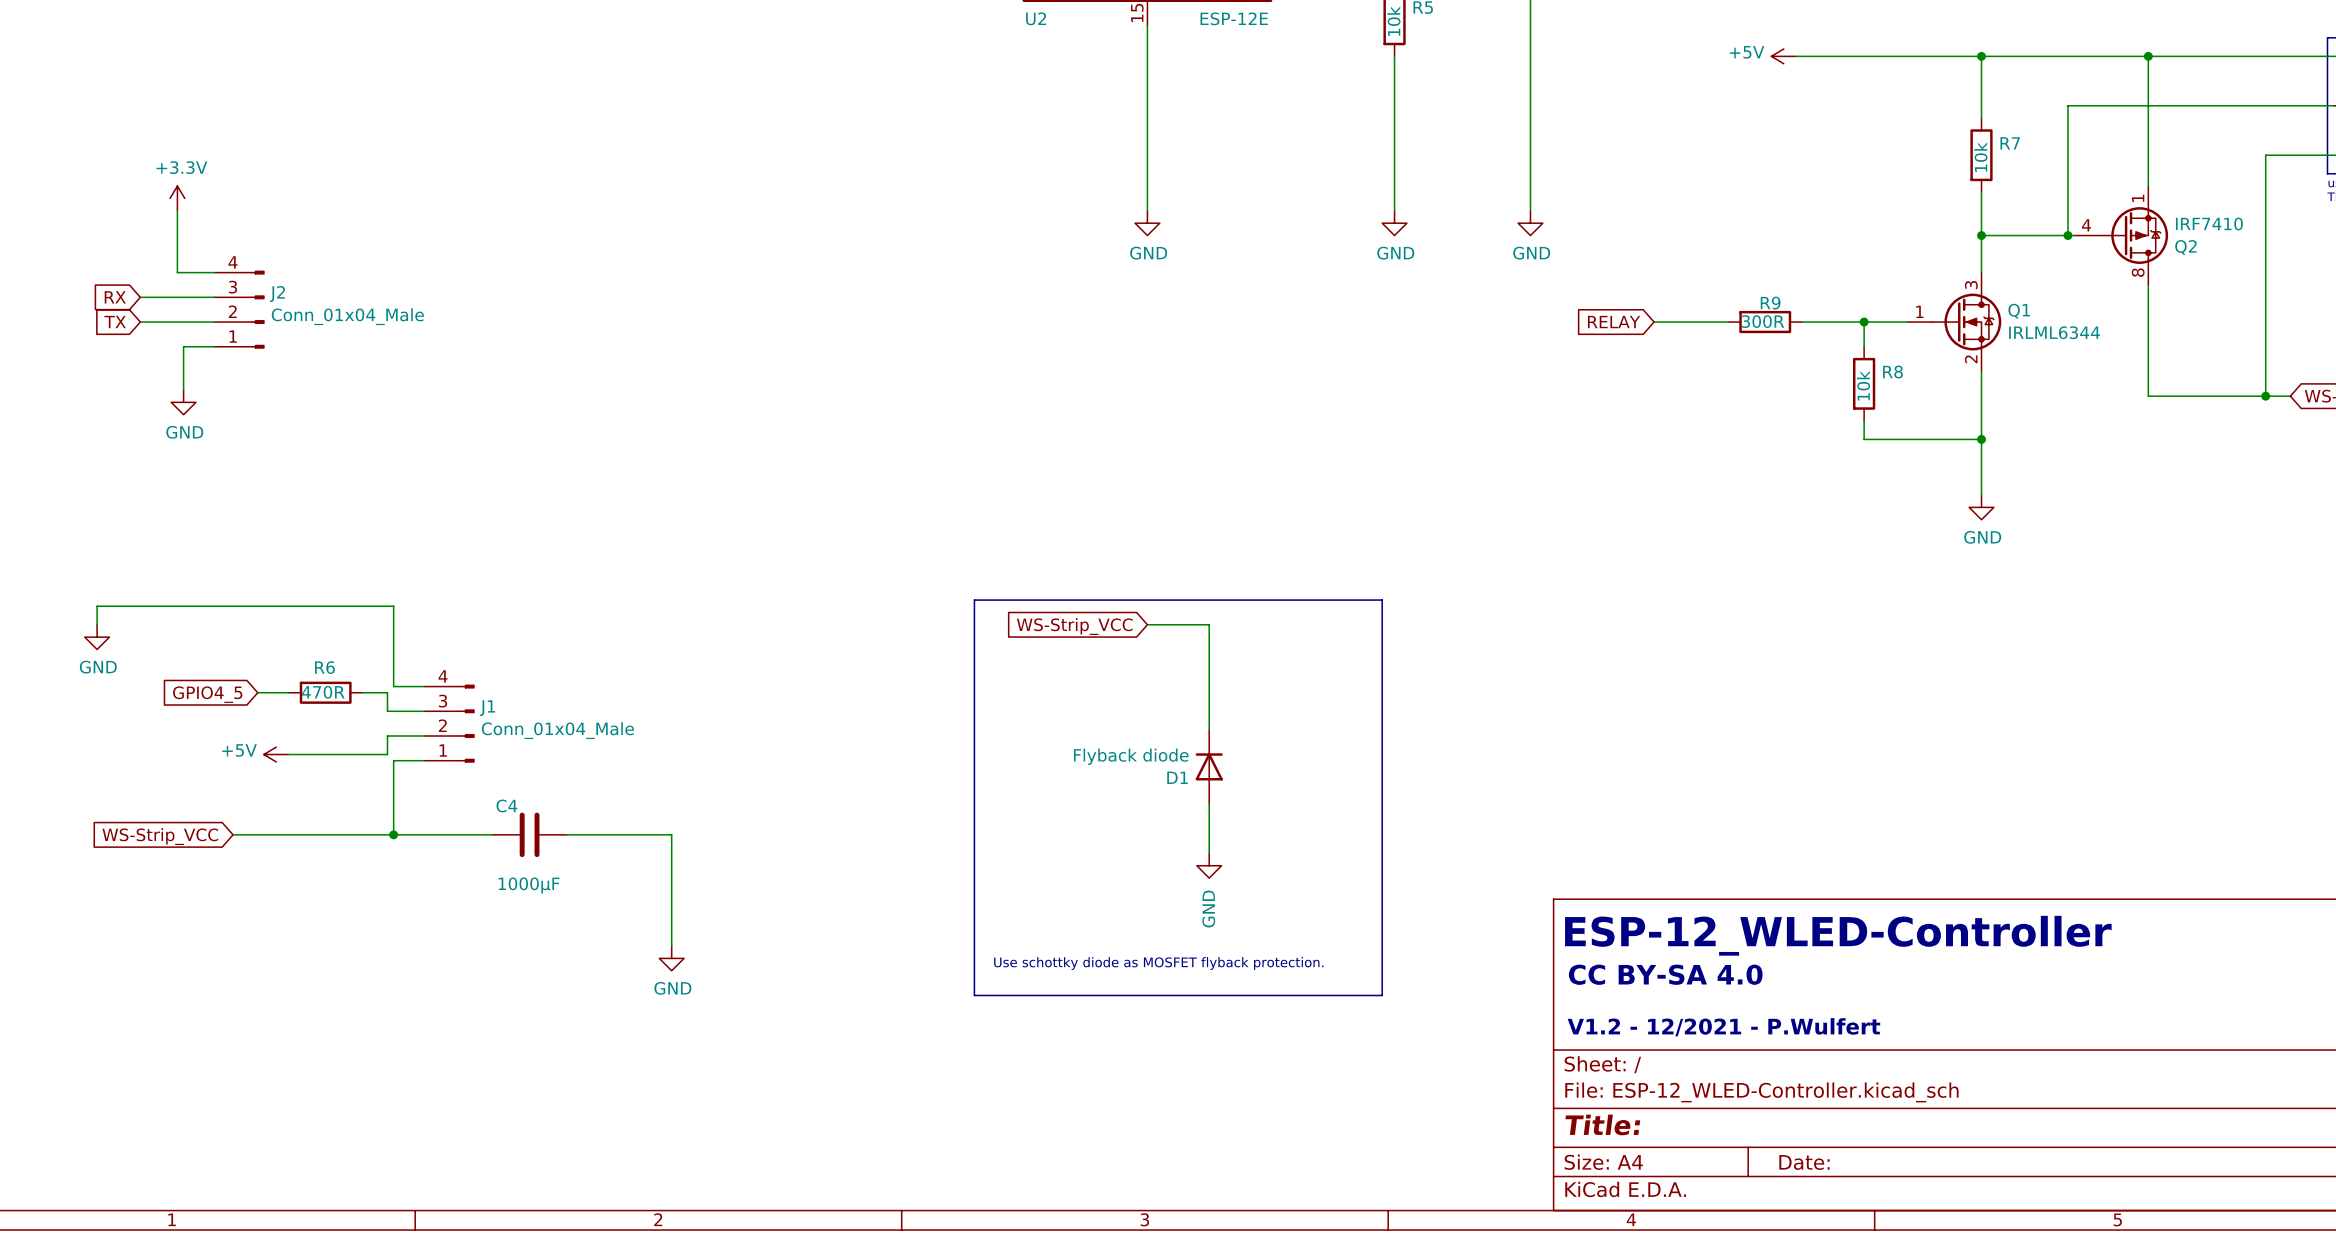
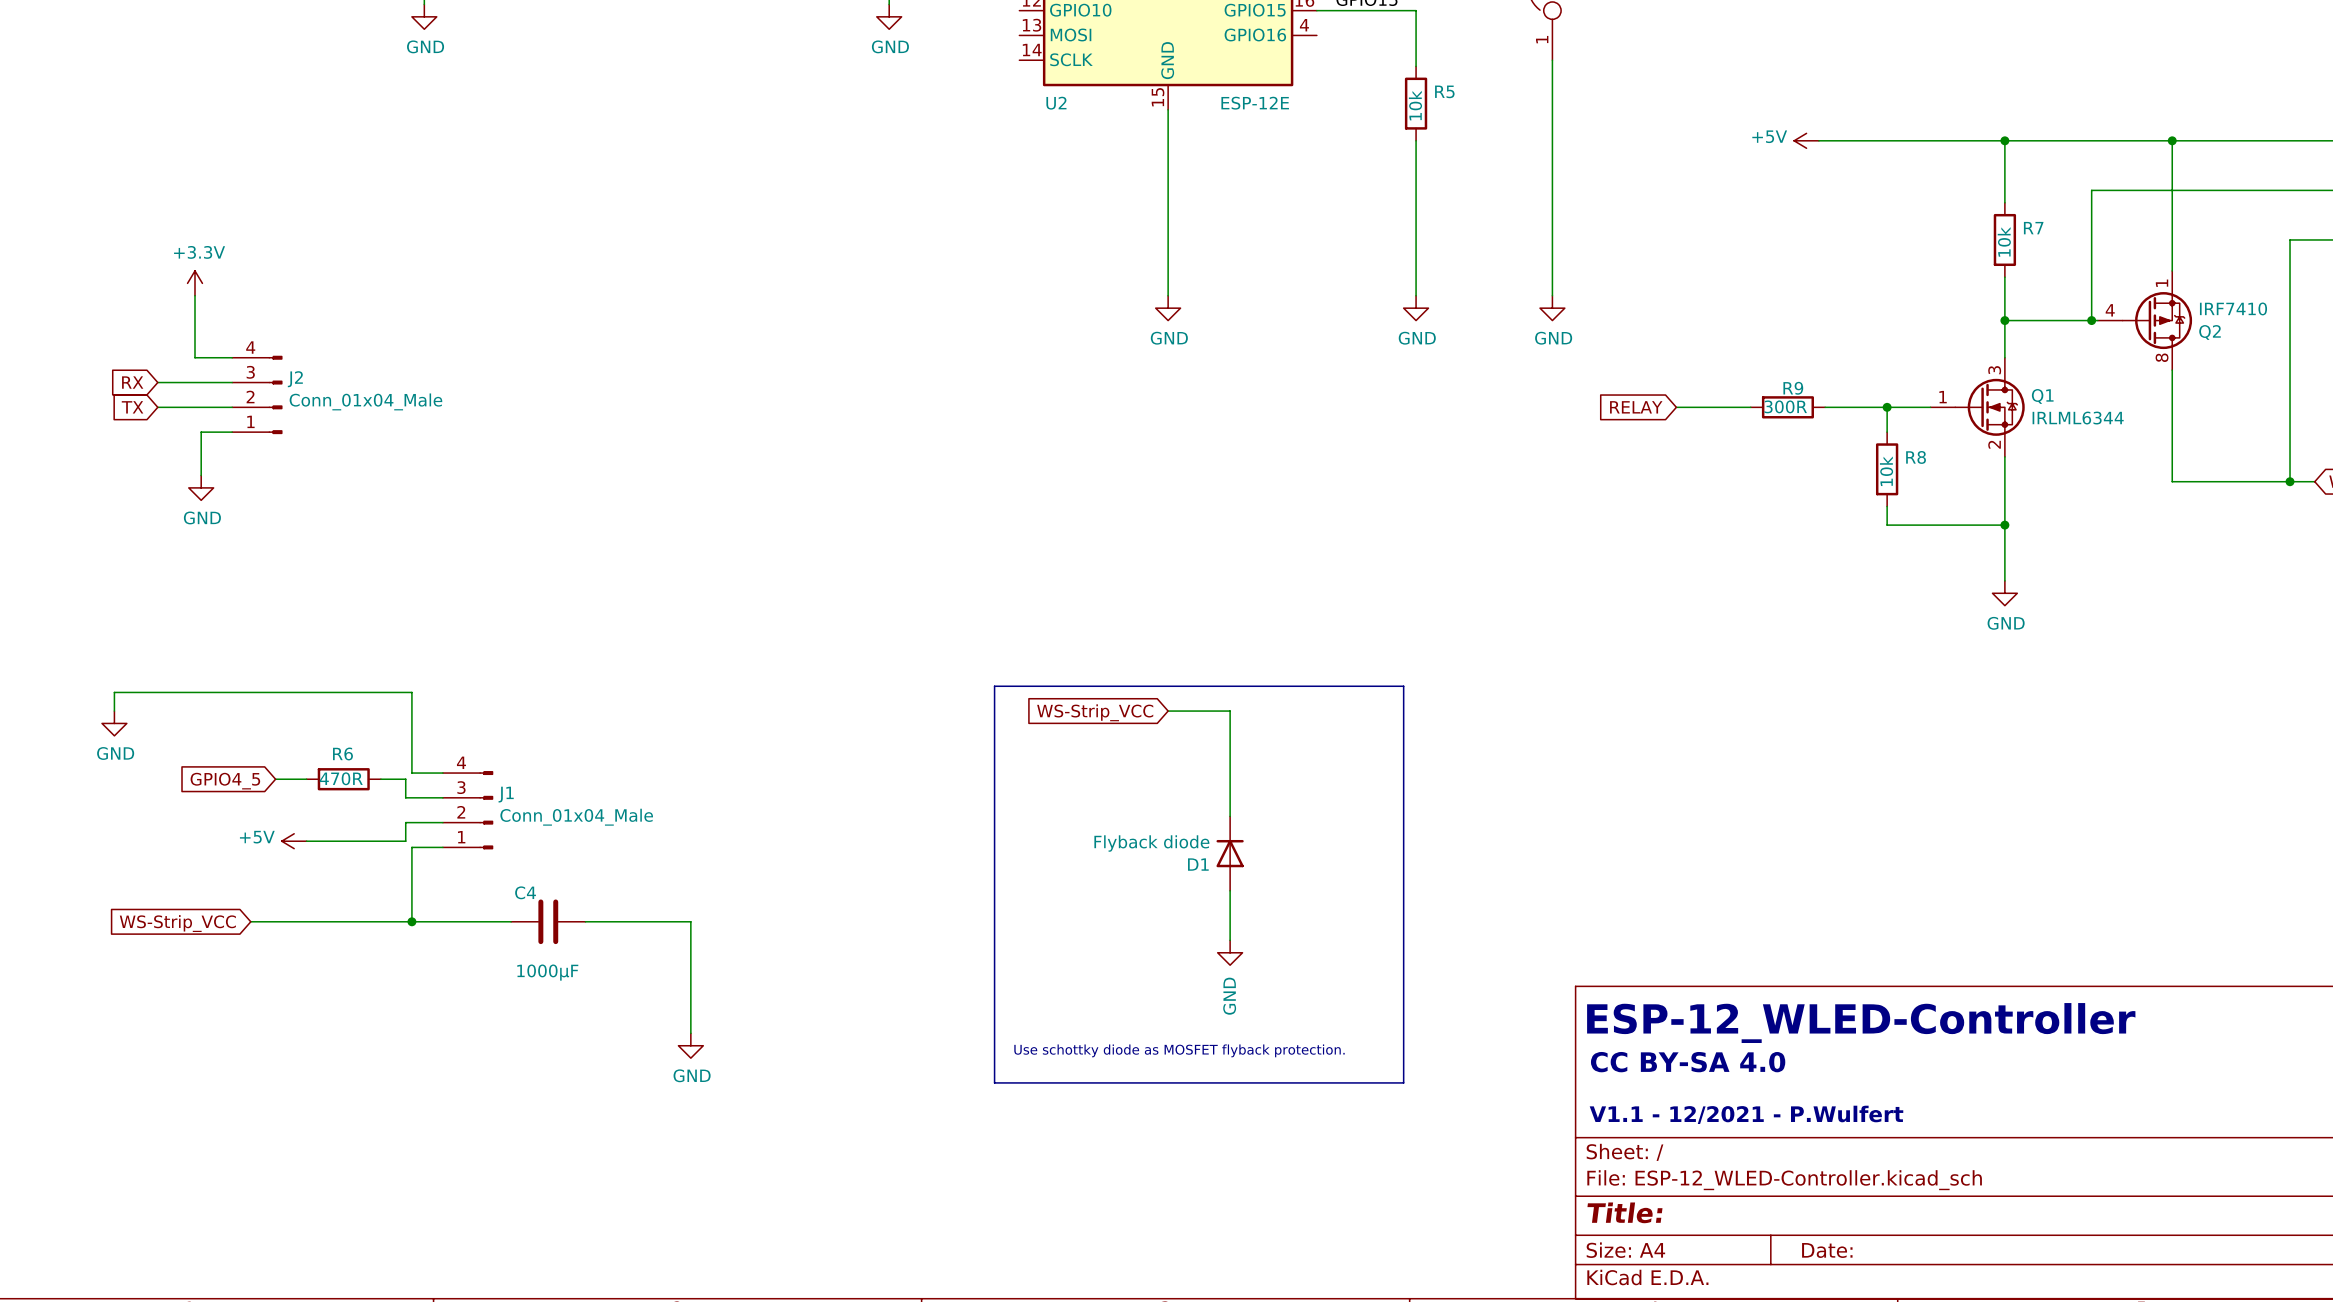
text: V1.2 - 12/2021 - P.Wulfert (1723, 1027) -> V1.1 - 12/2021 - P.Wulfert (1746, 1114)

